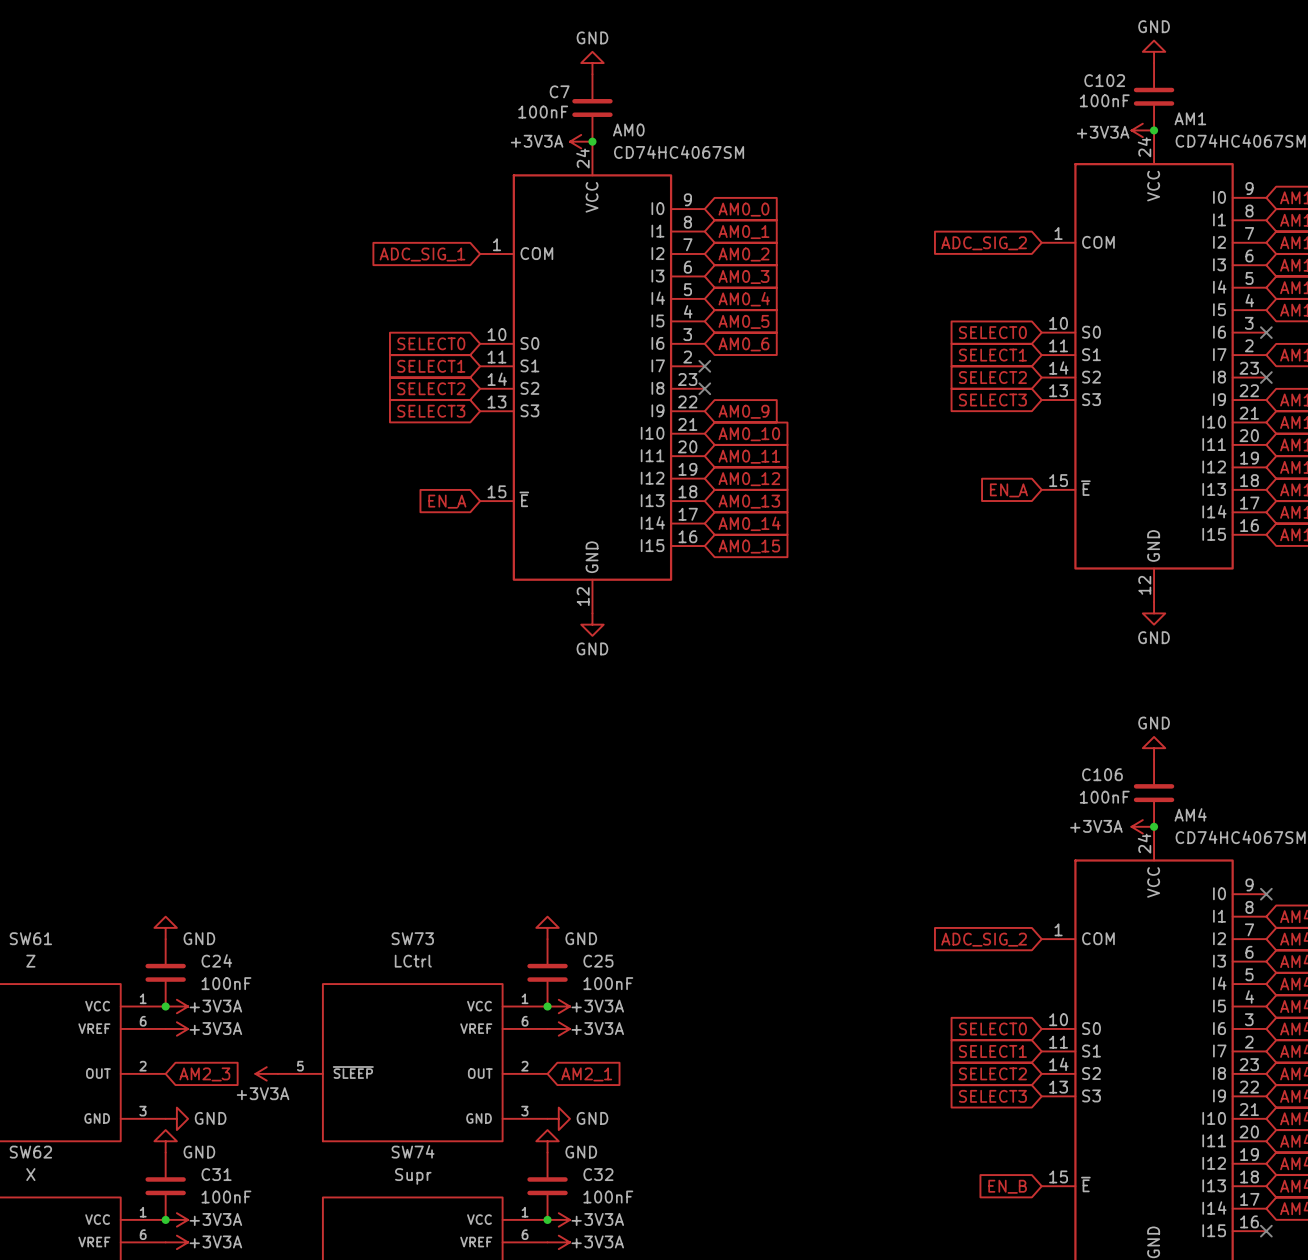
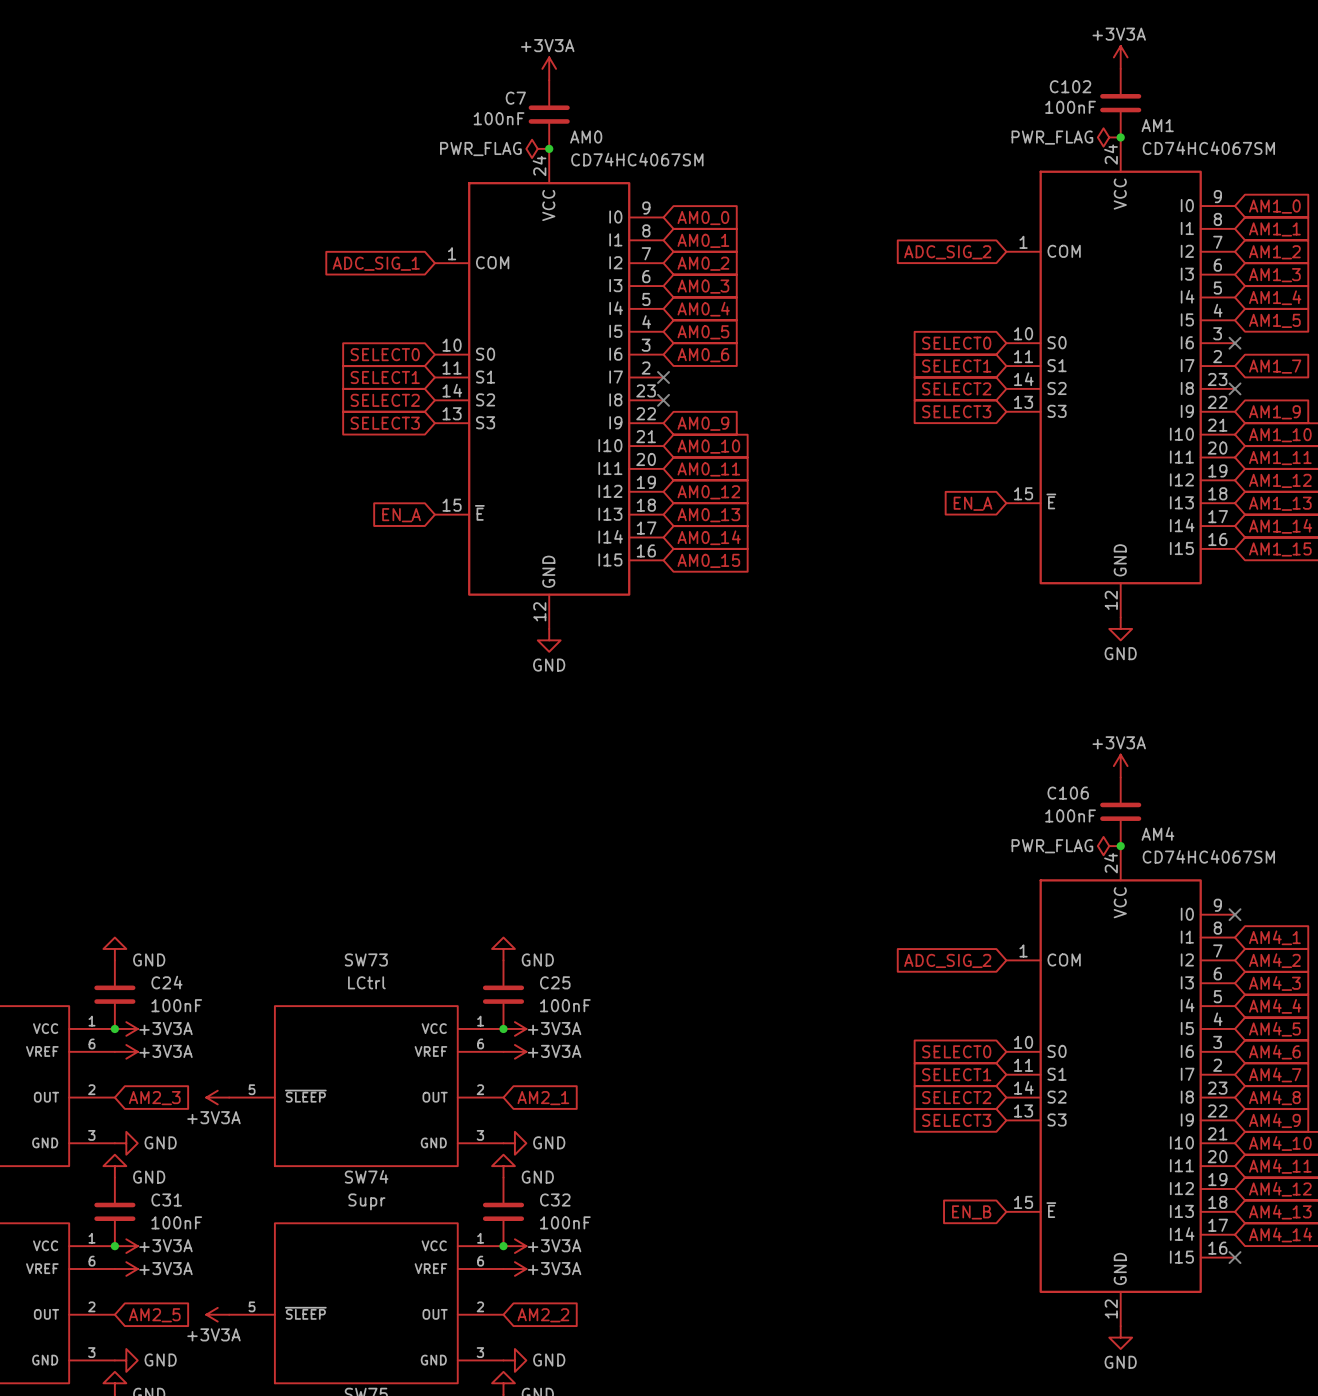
power symbol: GND (1154, 51) -> +3V3A (1120, 57)
power symbol: GND (592, 63) -> +3V3A (549, 68)
power symbol: +3V3A (1142, 130) -> PWR_FLAG (1109, 137)
power symbol: +3V3A (581, 141) -> PWR_FLAG (537, 148)
power symbol: GND (1154, 748) -> +3V3A (1120, 766)
power symbol: +3V3A (1142, 826) -> PWR_FLAG (1109, 846)

